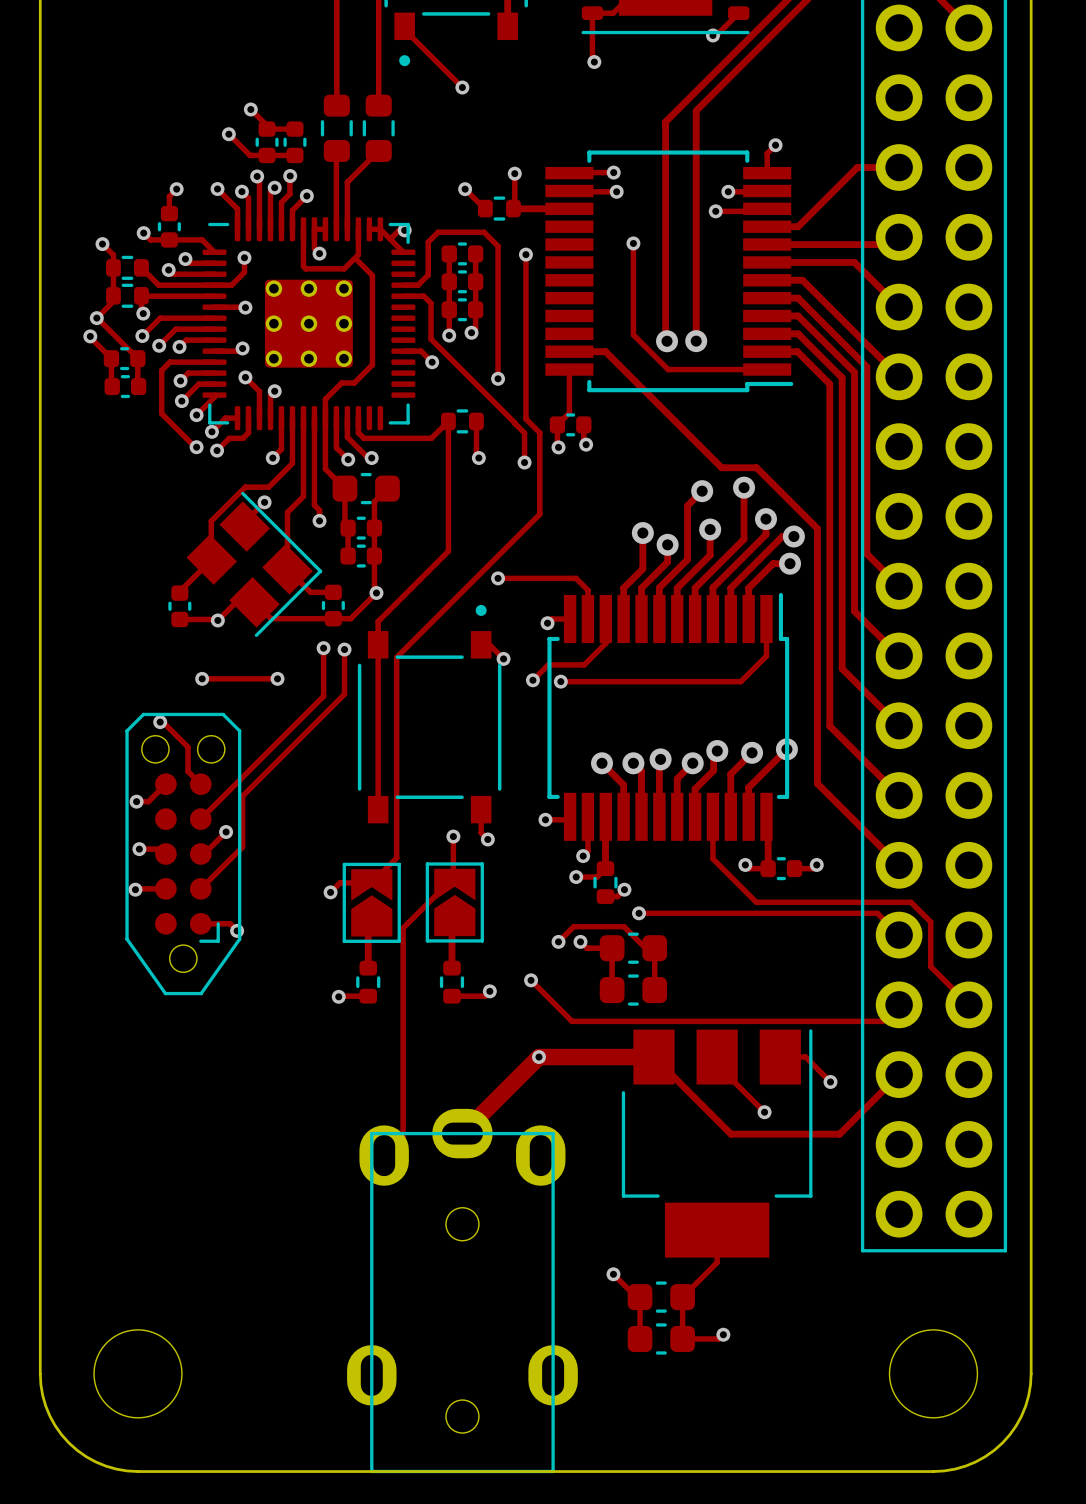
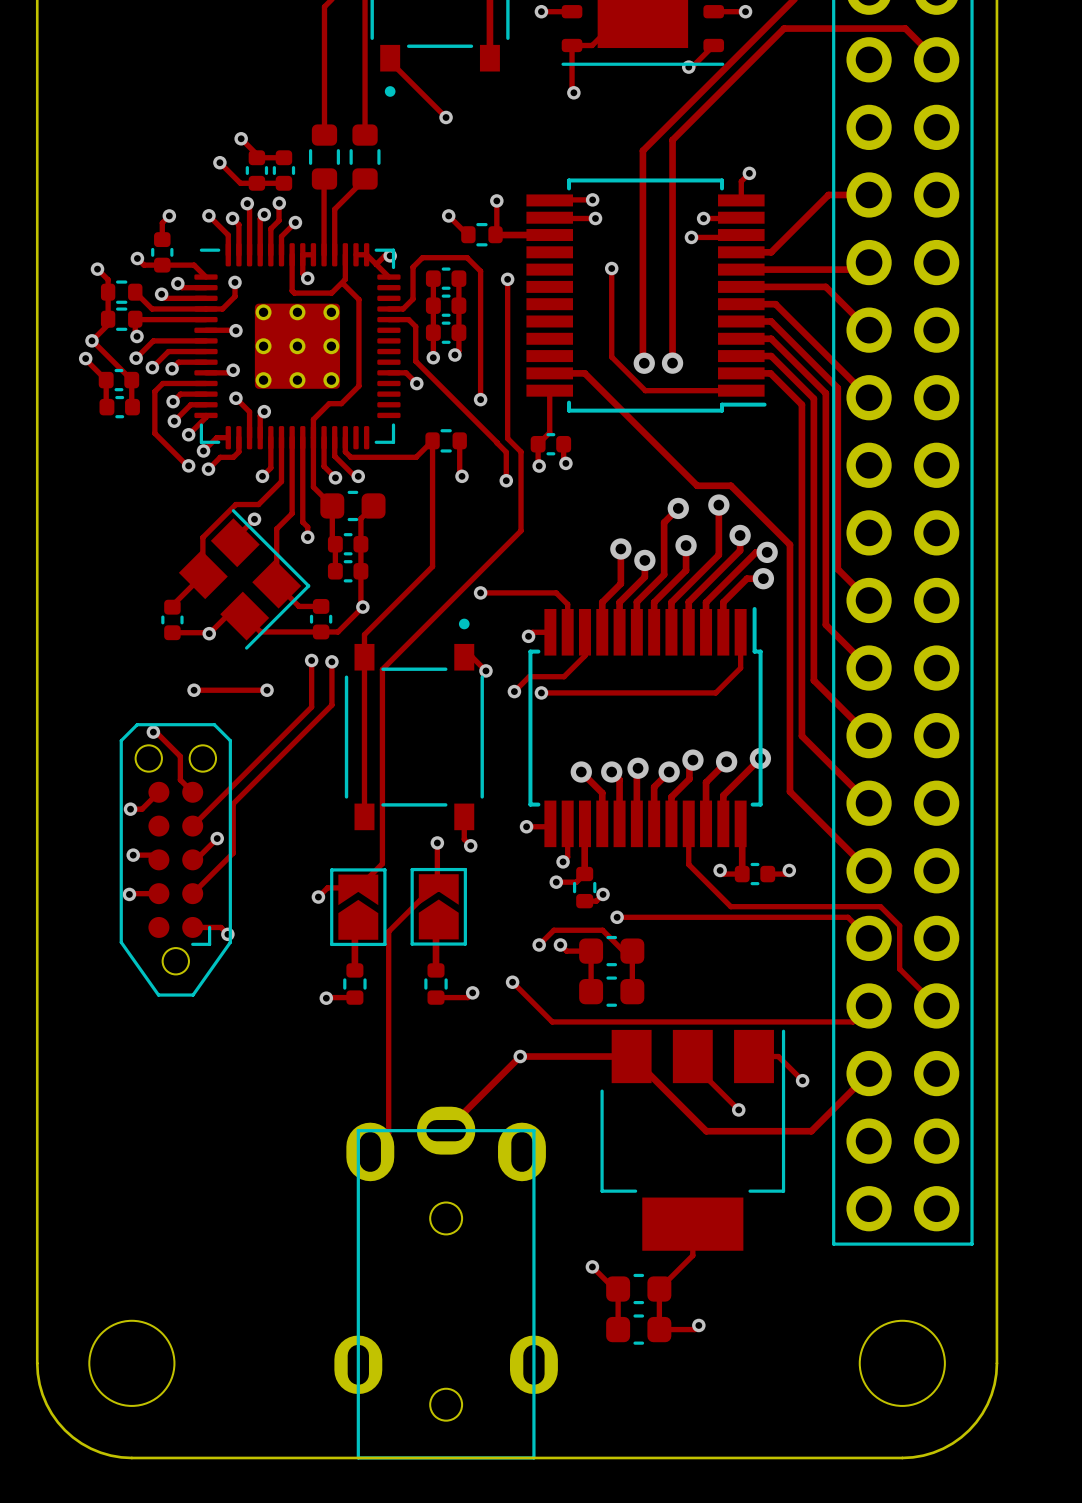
track width: thick (653, 1057) (538, 1057) (462, 1133) -> thin (631, 1056) (520, 1056) (446, 1130)

